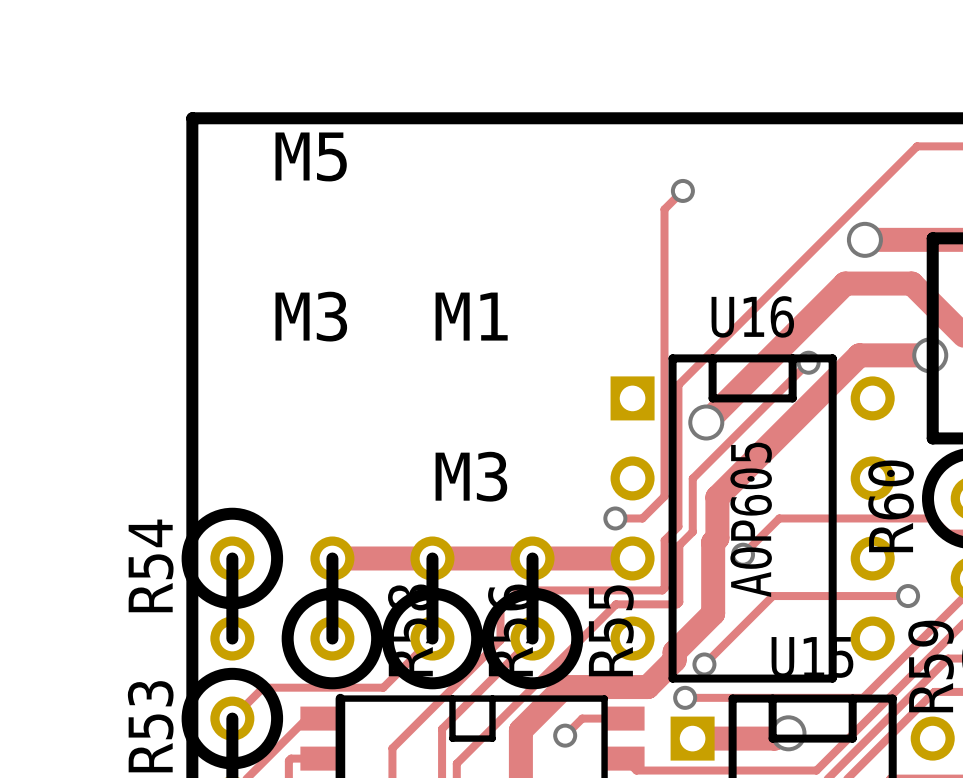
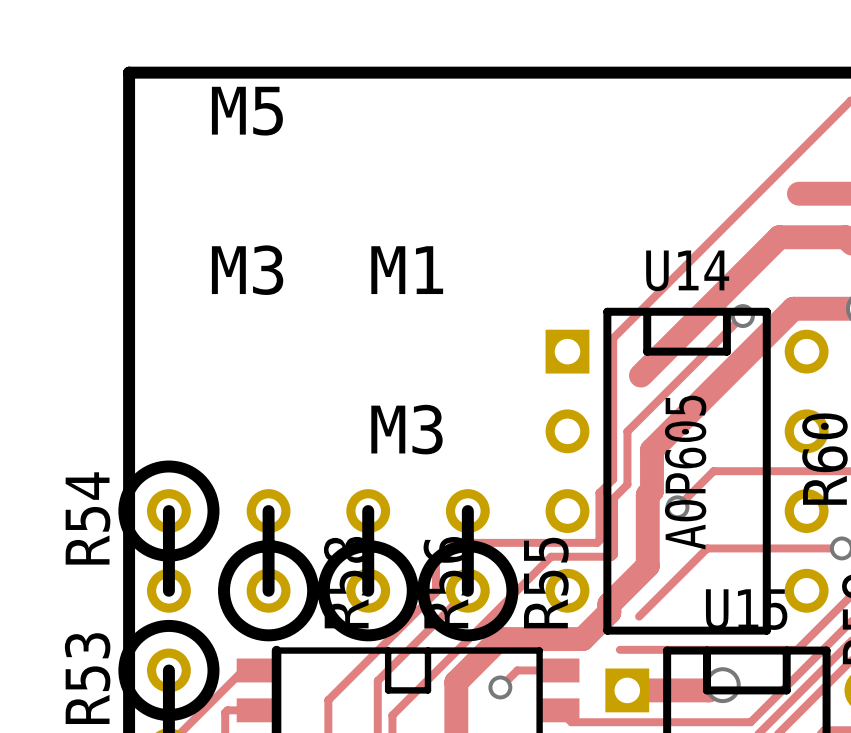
track: (682, 190) (664, 209) (664, 496) (642, 518) (615, 518) -> none
via: (682, 190) -> none
via: (864, 239) -> none
U16 name: U16 (752, 316) -> U14 (687, 270)
via: (706, 422) -> none
via: (615, 518) -> none
track: (332, 558) (632, 558) -> none
track: (432, 638) (383, 687) (263, 687) (232, 718) -> none
via: (704, 664) -> none
via: (685, 697) -> none

